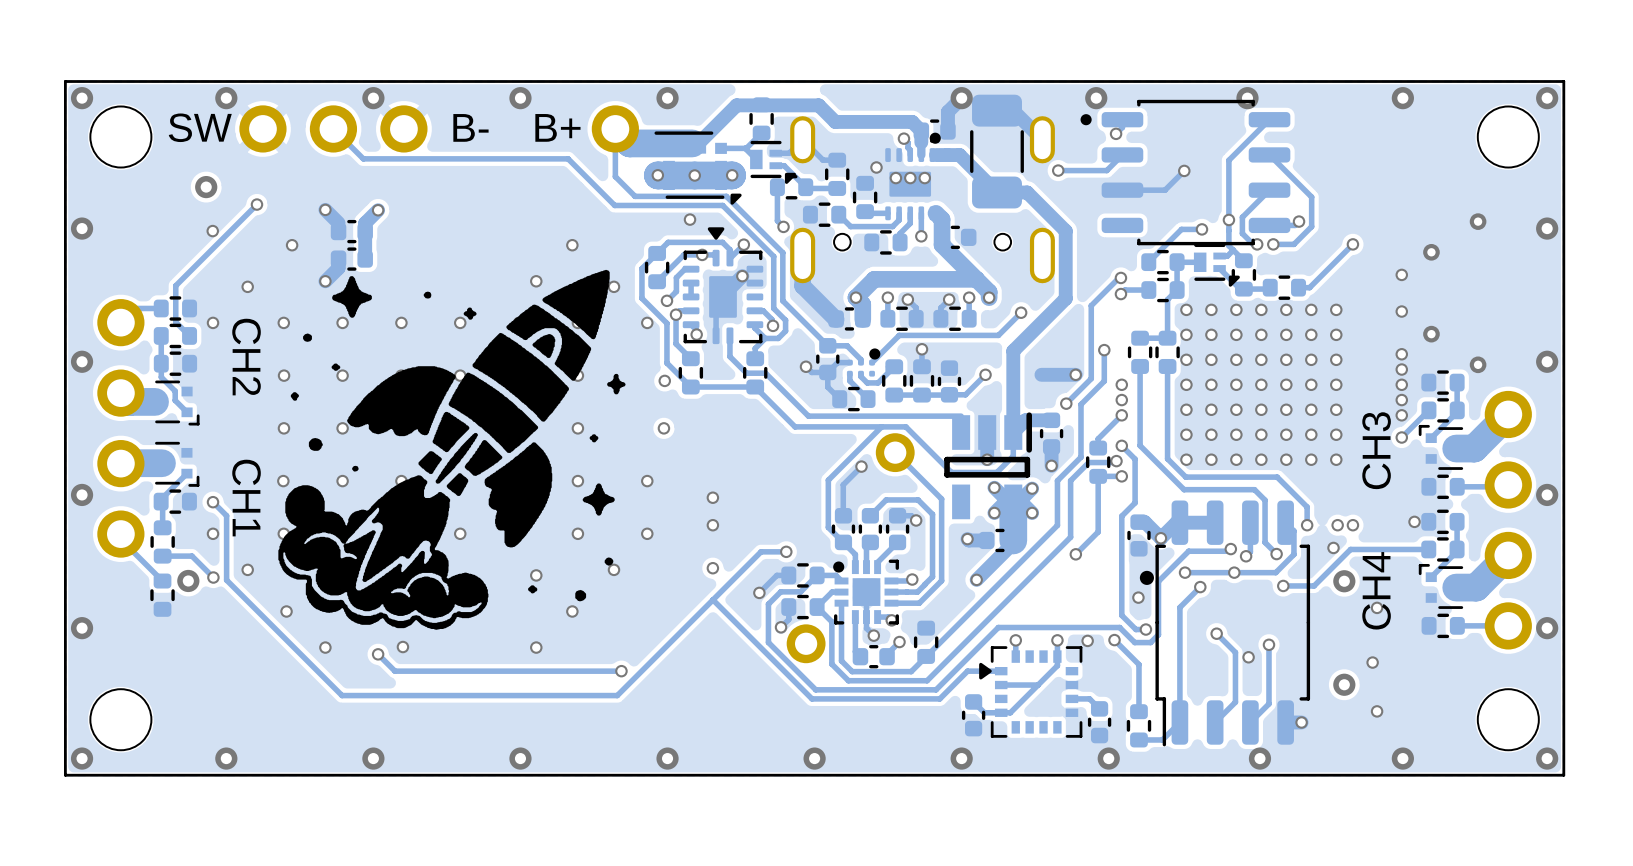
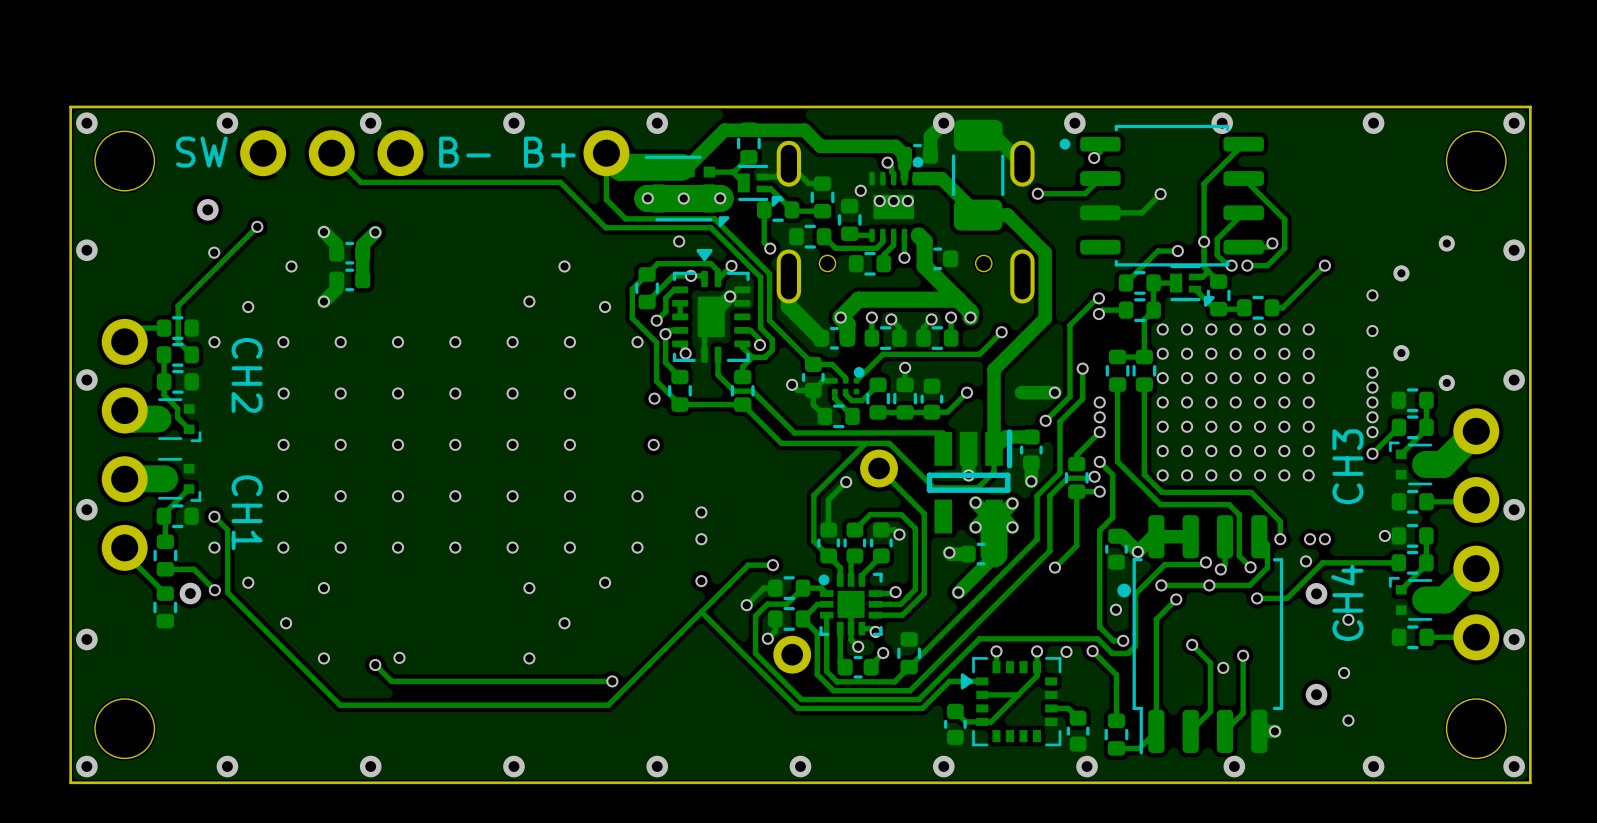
drawing: [278, 269, 626, 630] -> none

